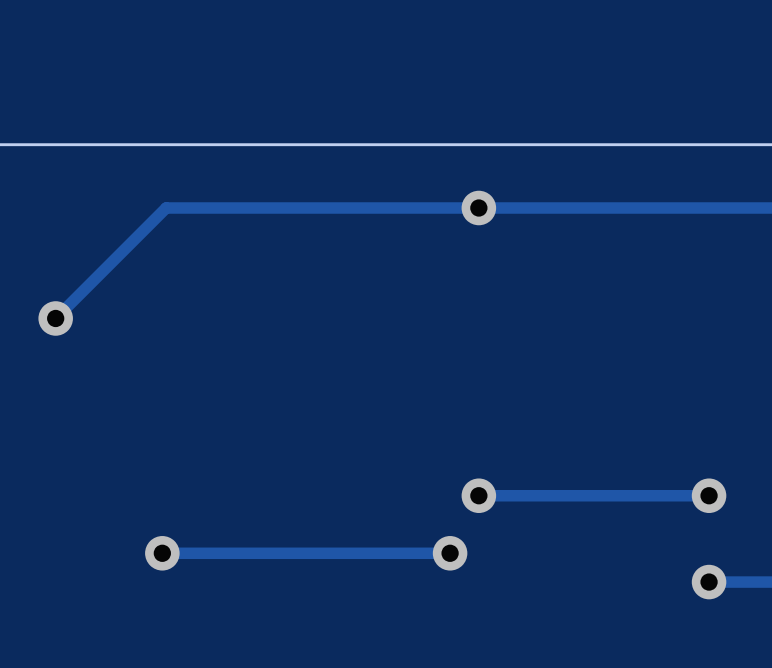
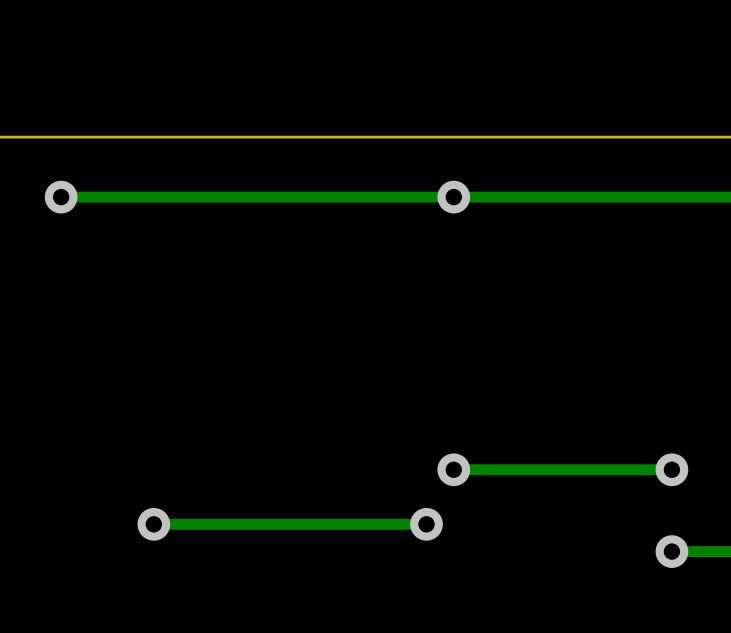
via: none -> (61, 197)
track: (166, 208) (55, 318) -> (157, 197) (61, 197)
via: (55, 318) -> none

